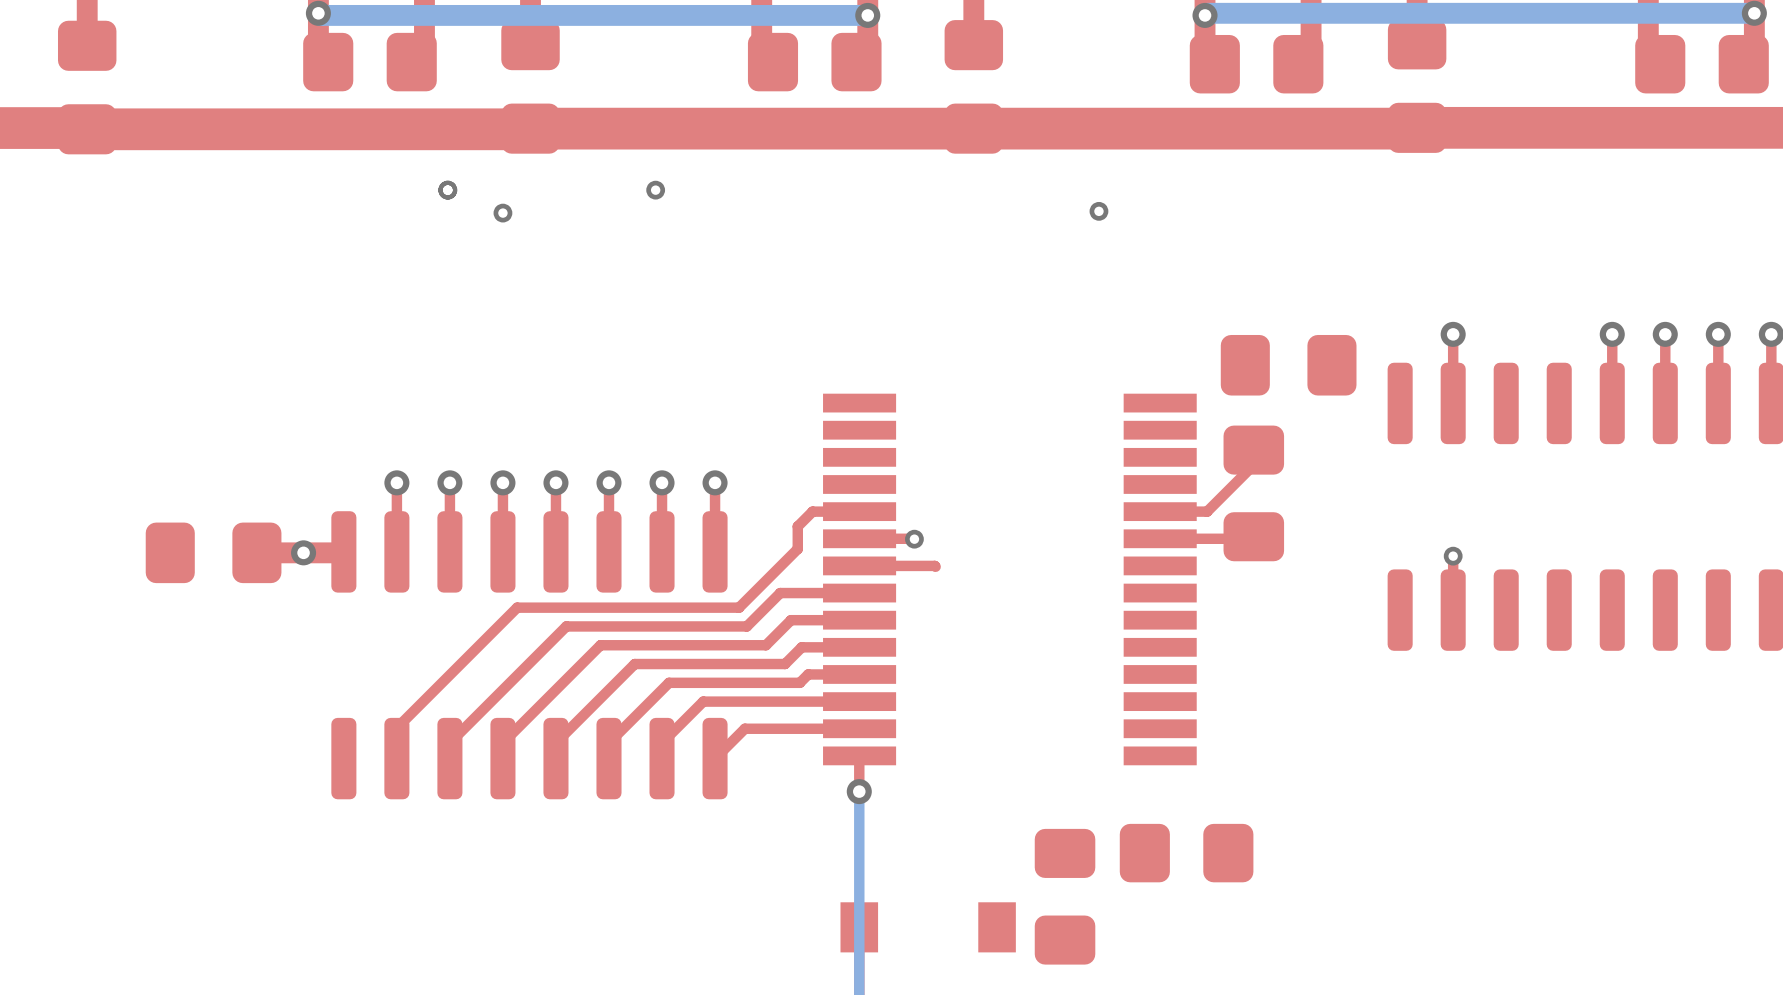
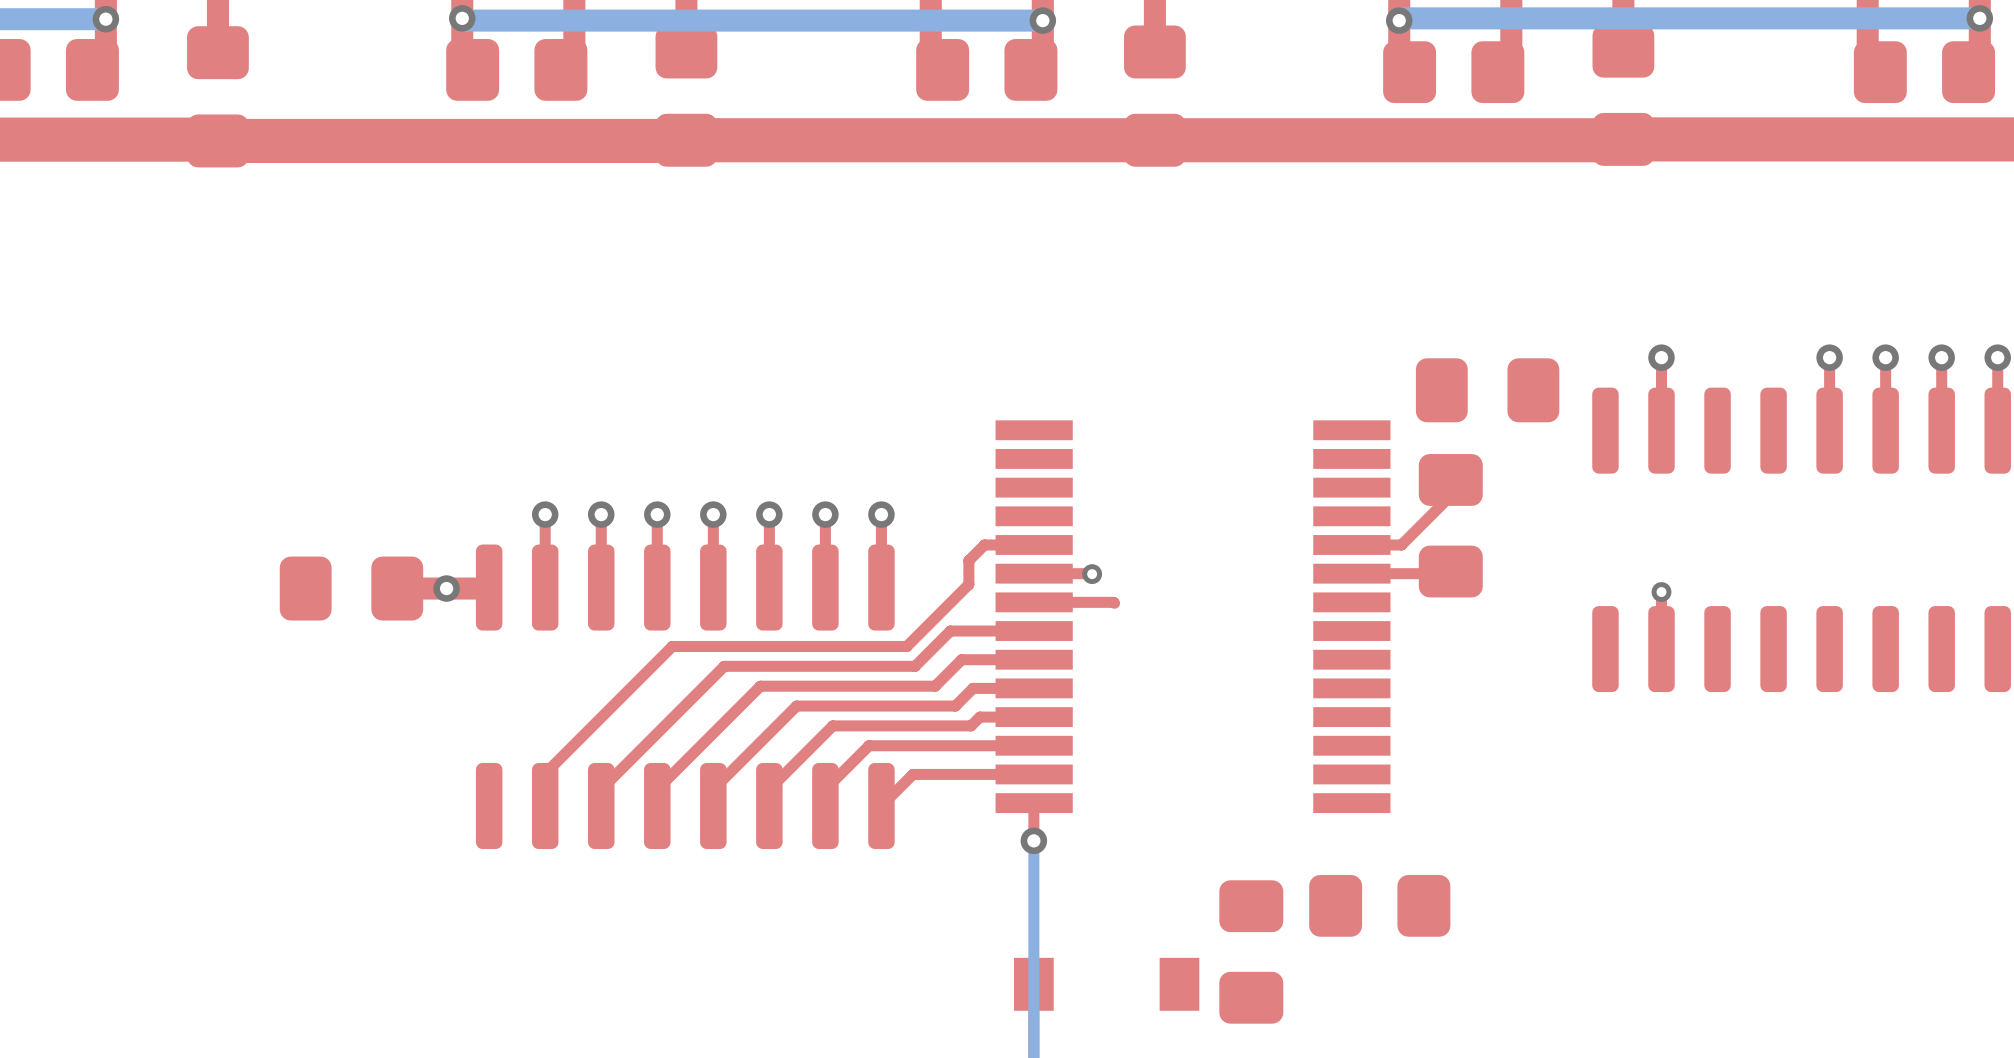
via: (447, 190) -> none
via: (655, 190) -> none
via: (1098, 211) -> none
via: (502, 213) -> none

